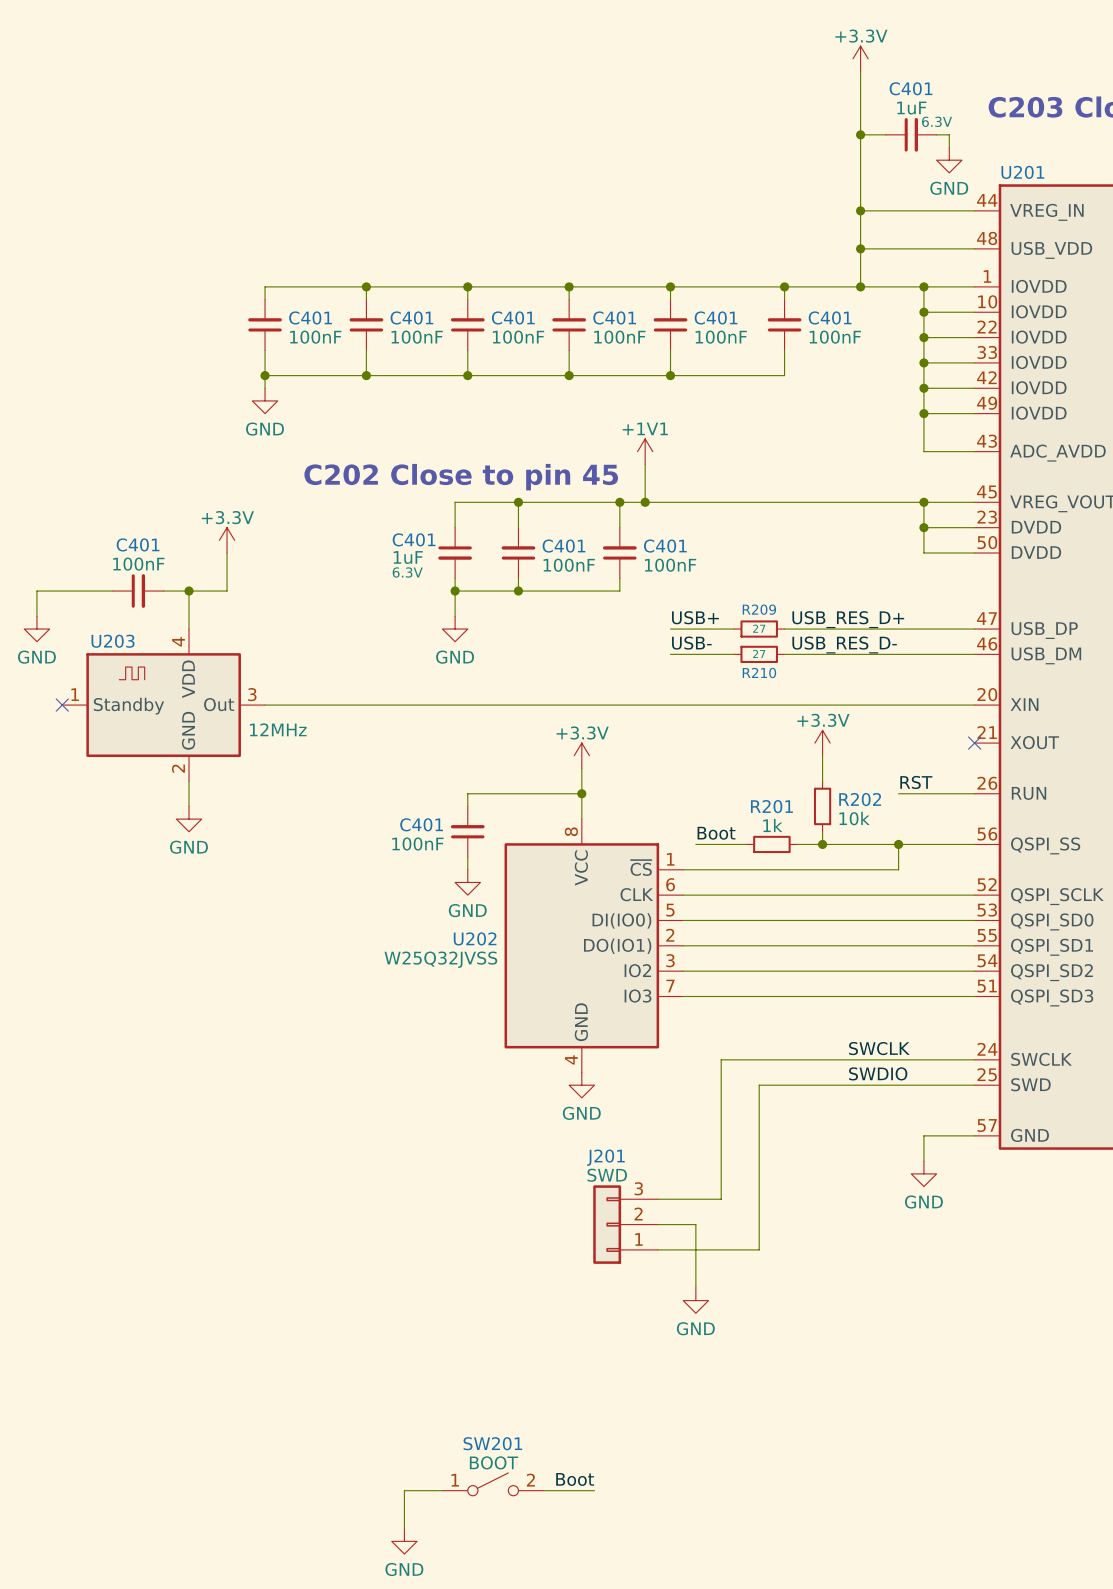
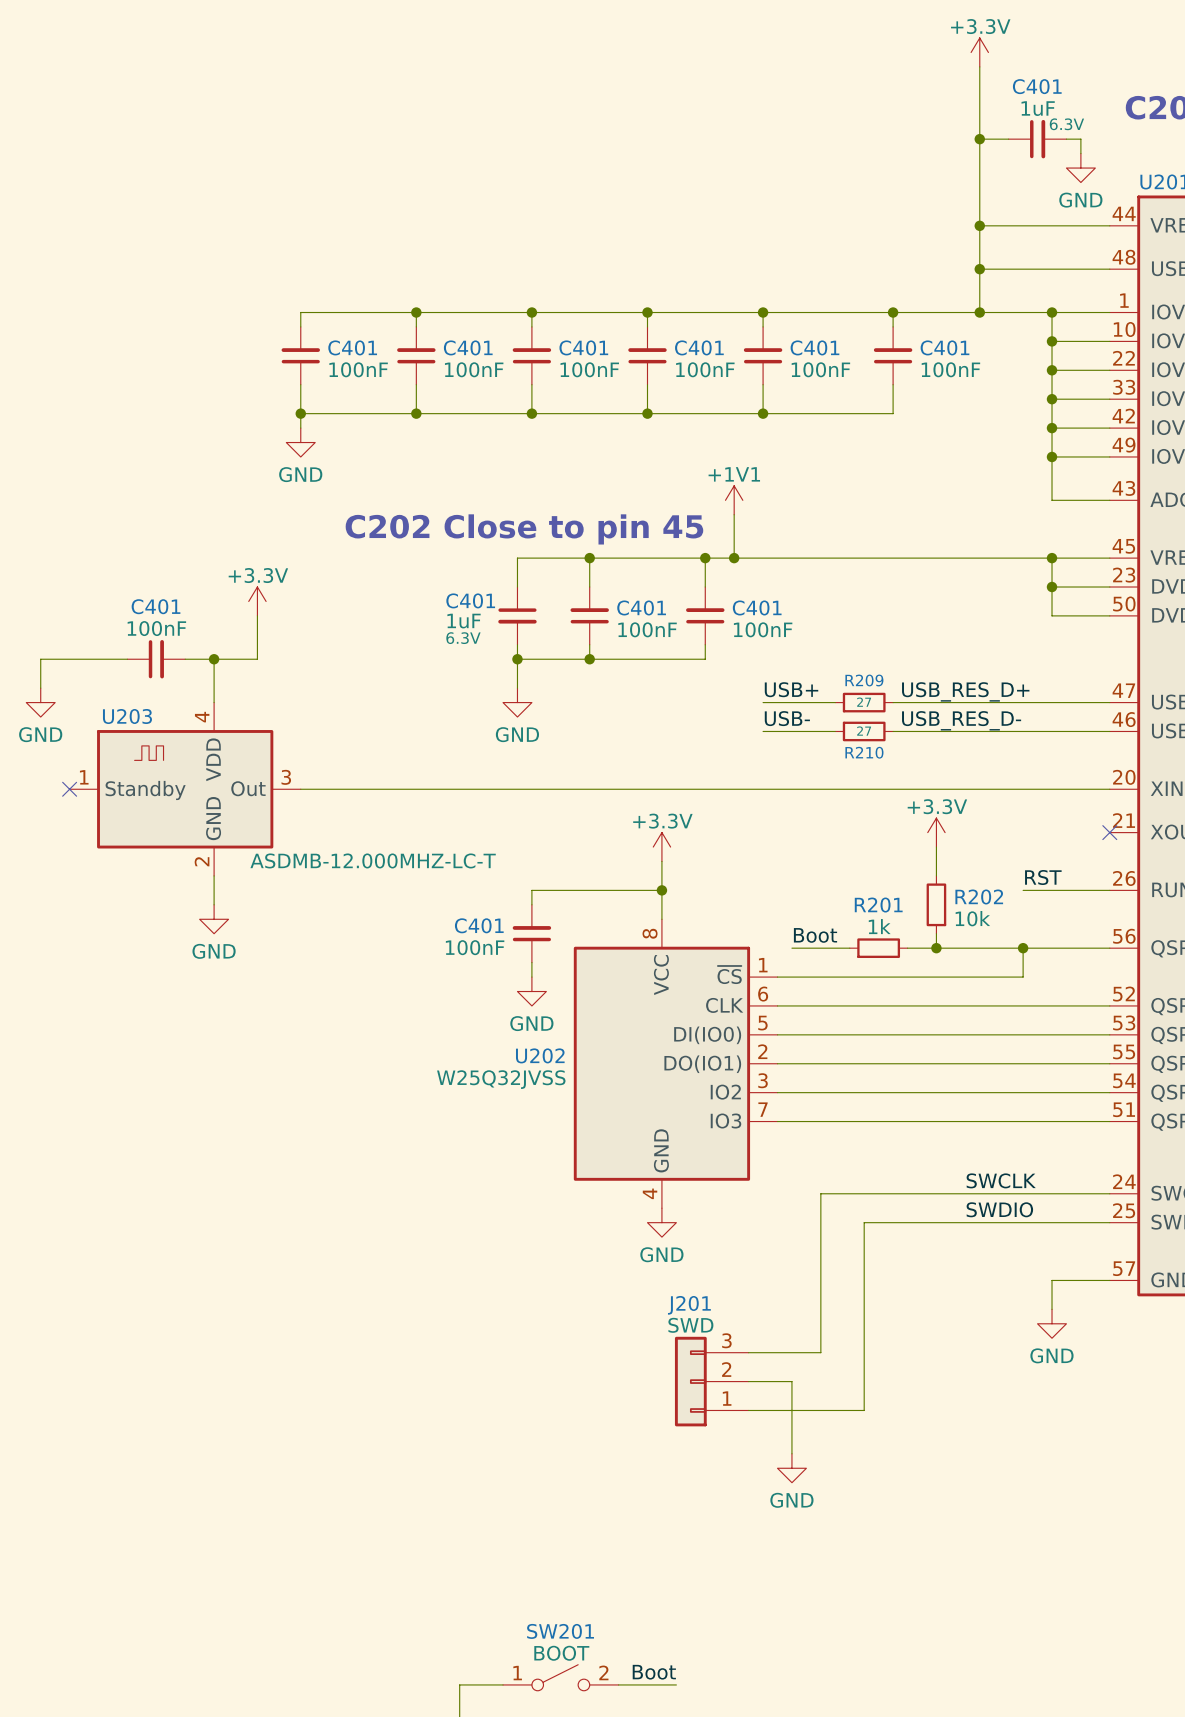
U203 value: 12MHz (278, 729) -> ASDMB-12.000MHZ-LC-T (373, 860)

